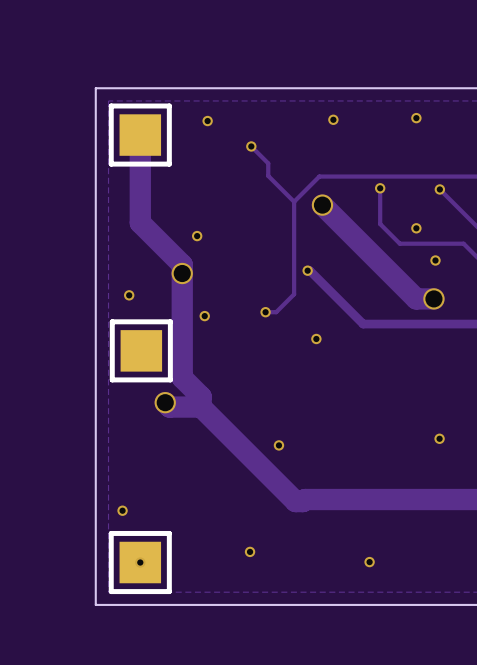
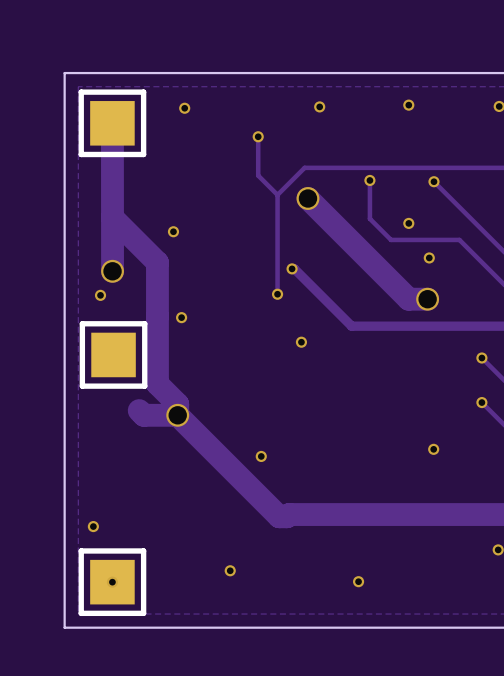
track: (140, 135) (140, 222) -> (112, 123) (112, 271)
track: (251, 146) (268, 163) (268, 175) (276, 183) -> (258, 136) (258, 175)
via position: (251, 146) -> (258, 136)
via position: (182, 273) -> (112, 271)
track: (294, 294) (276, 312) (265, 312) -> none
via position: (265, 312) -> (277, 294)
via position: (165, 402) -> (177, 415)

